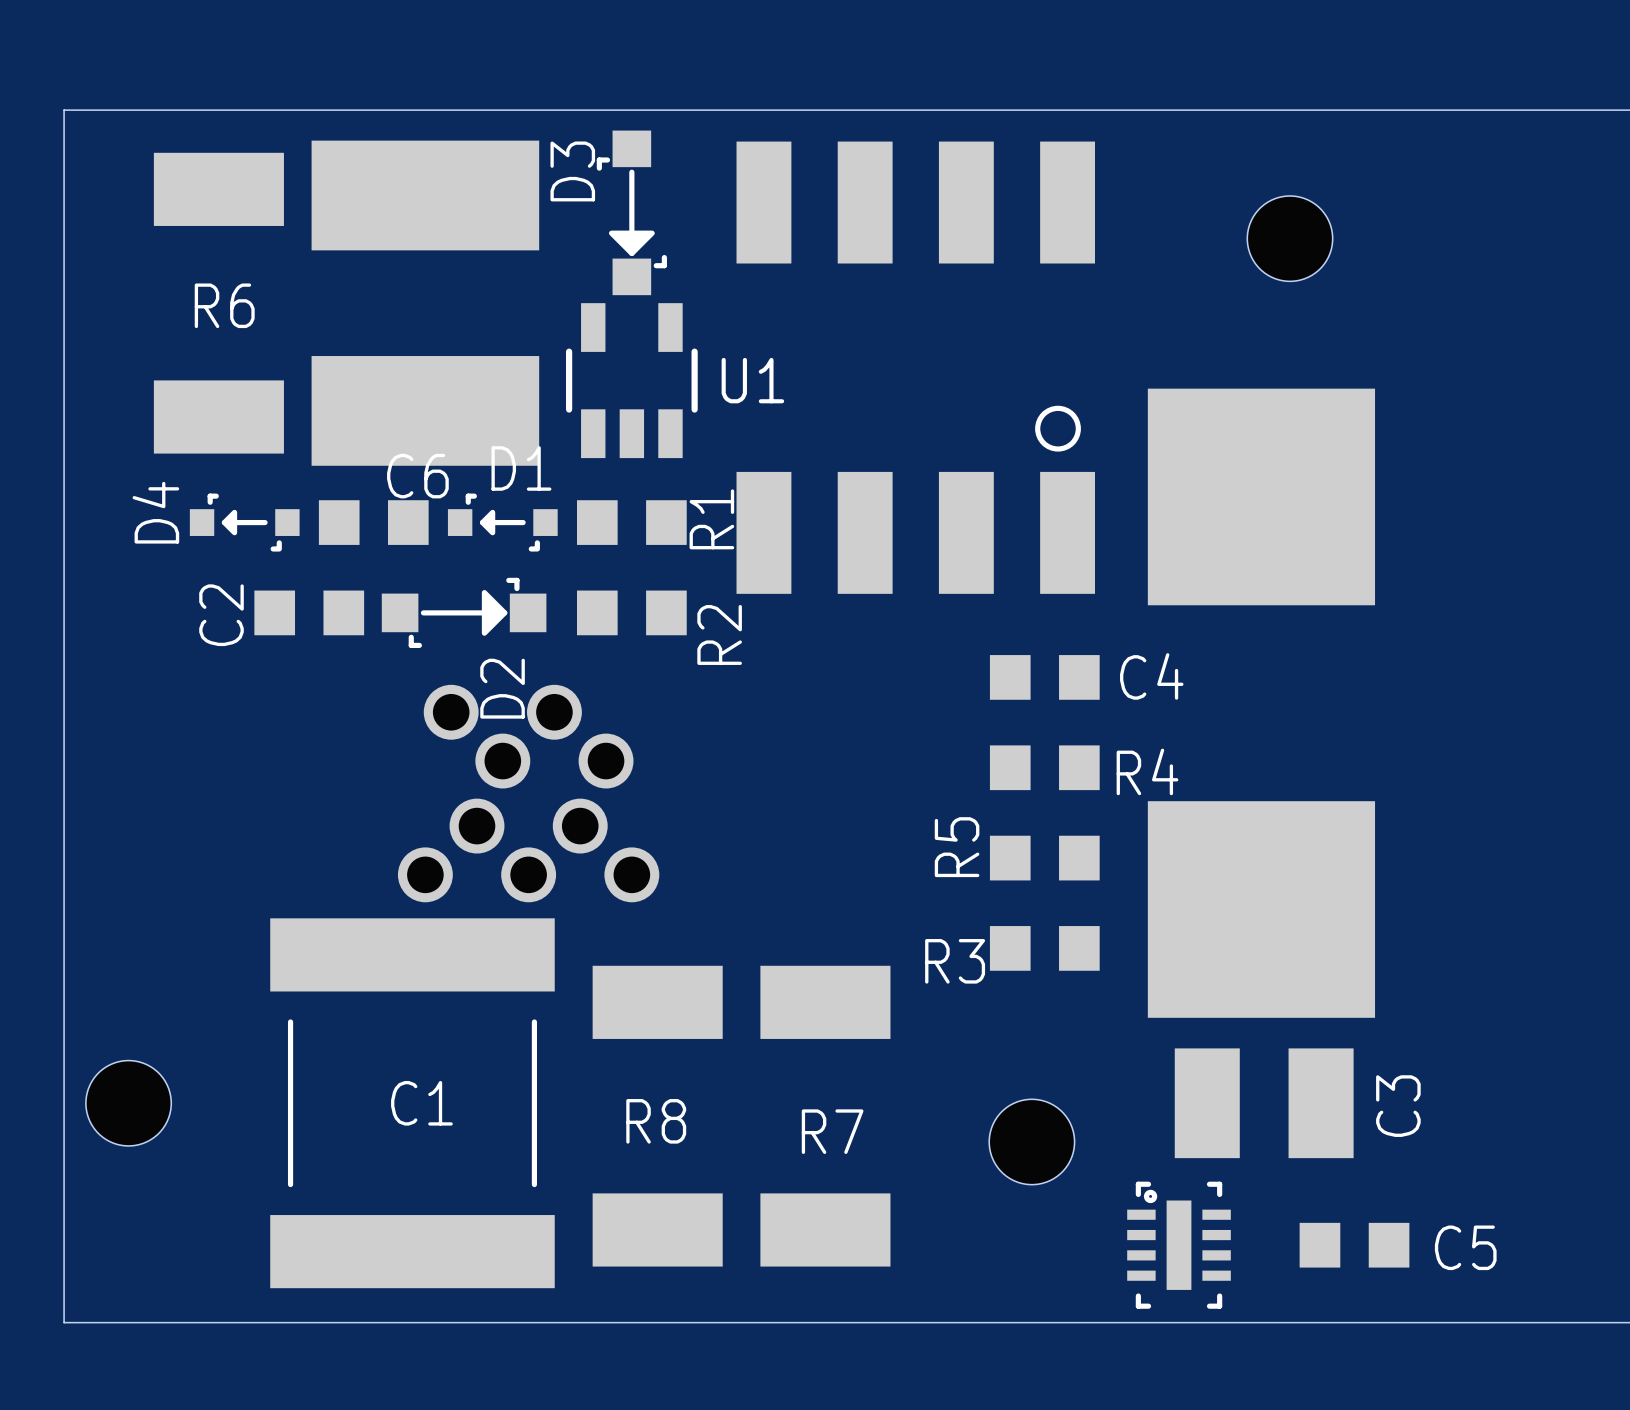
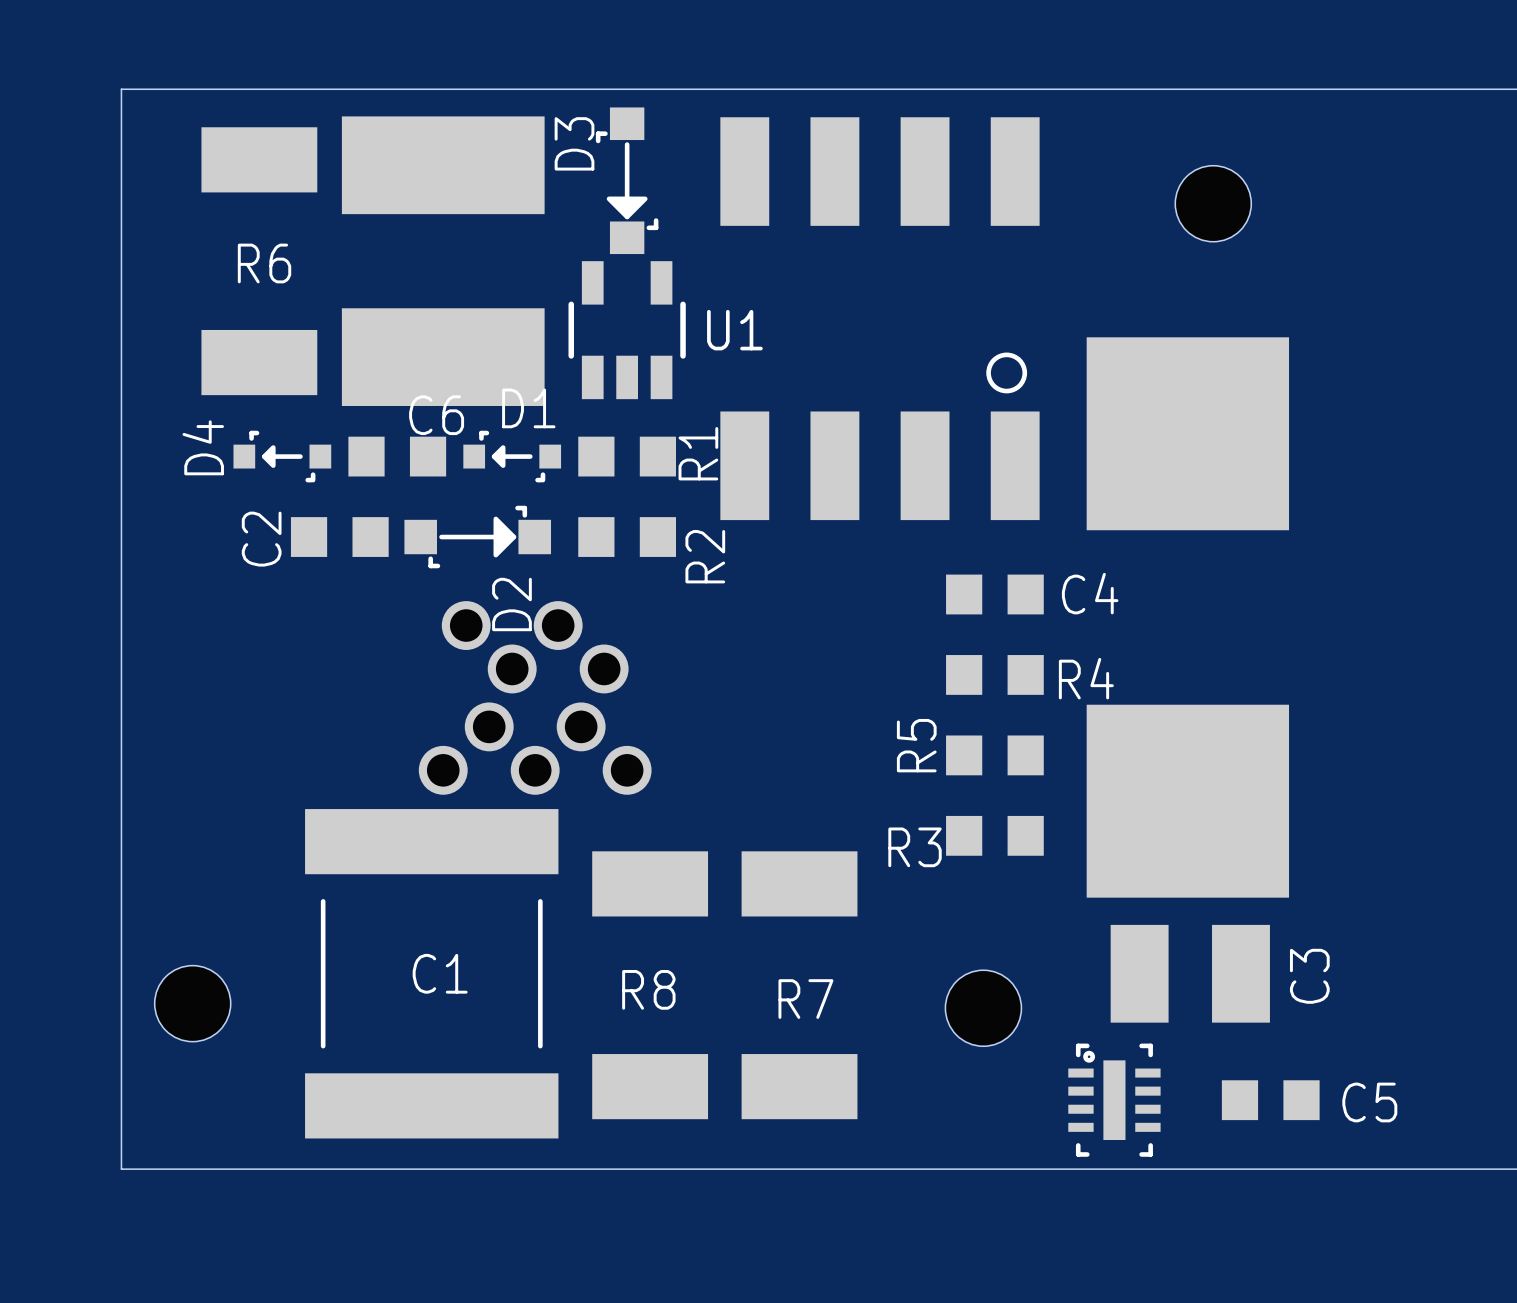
hole position: (128, 1103) -> (192, 1003)

